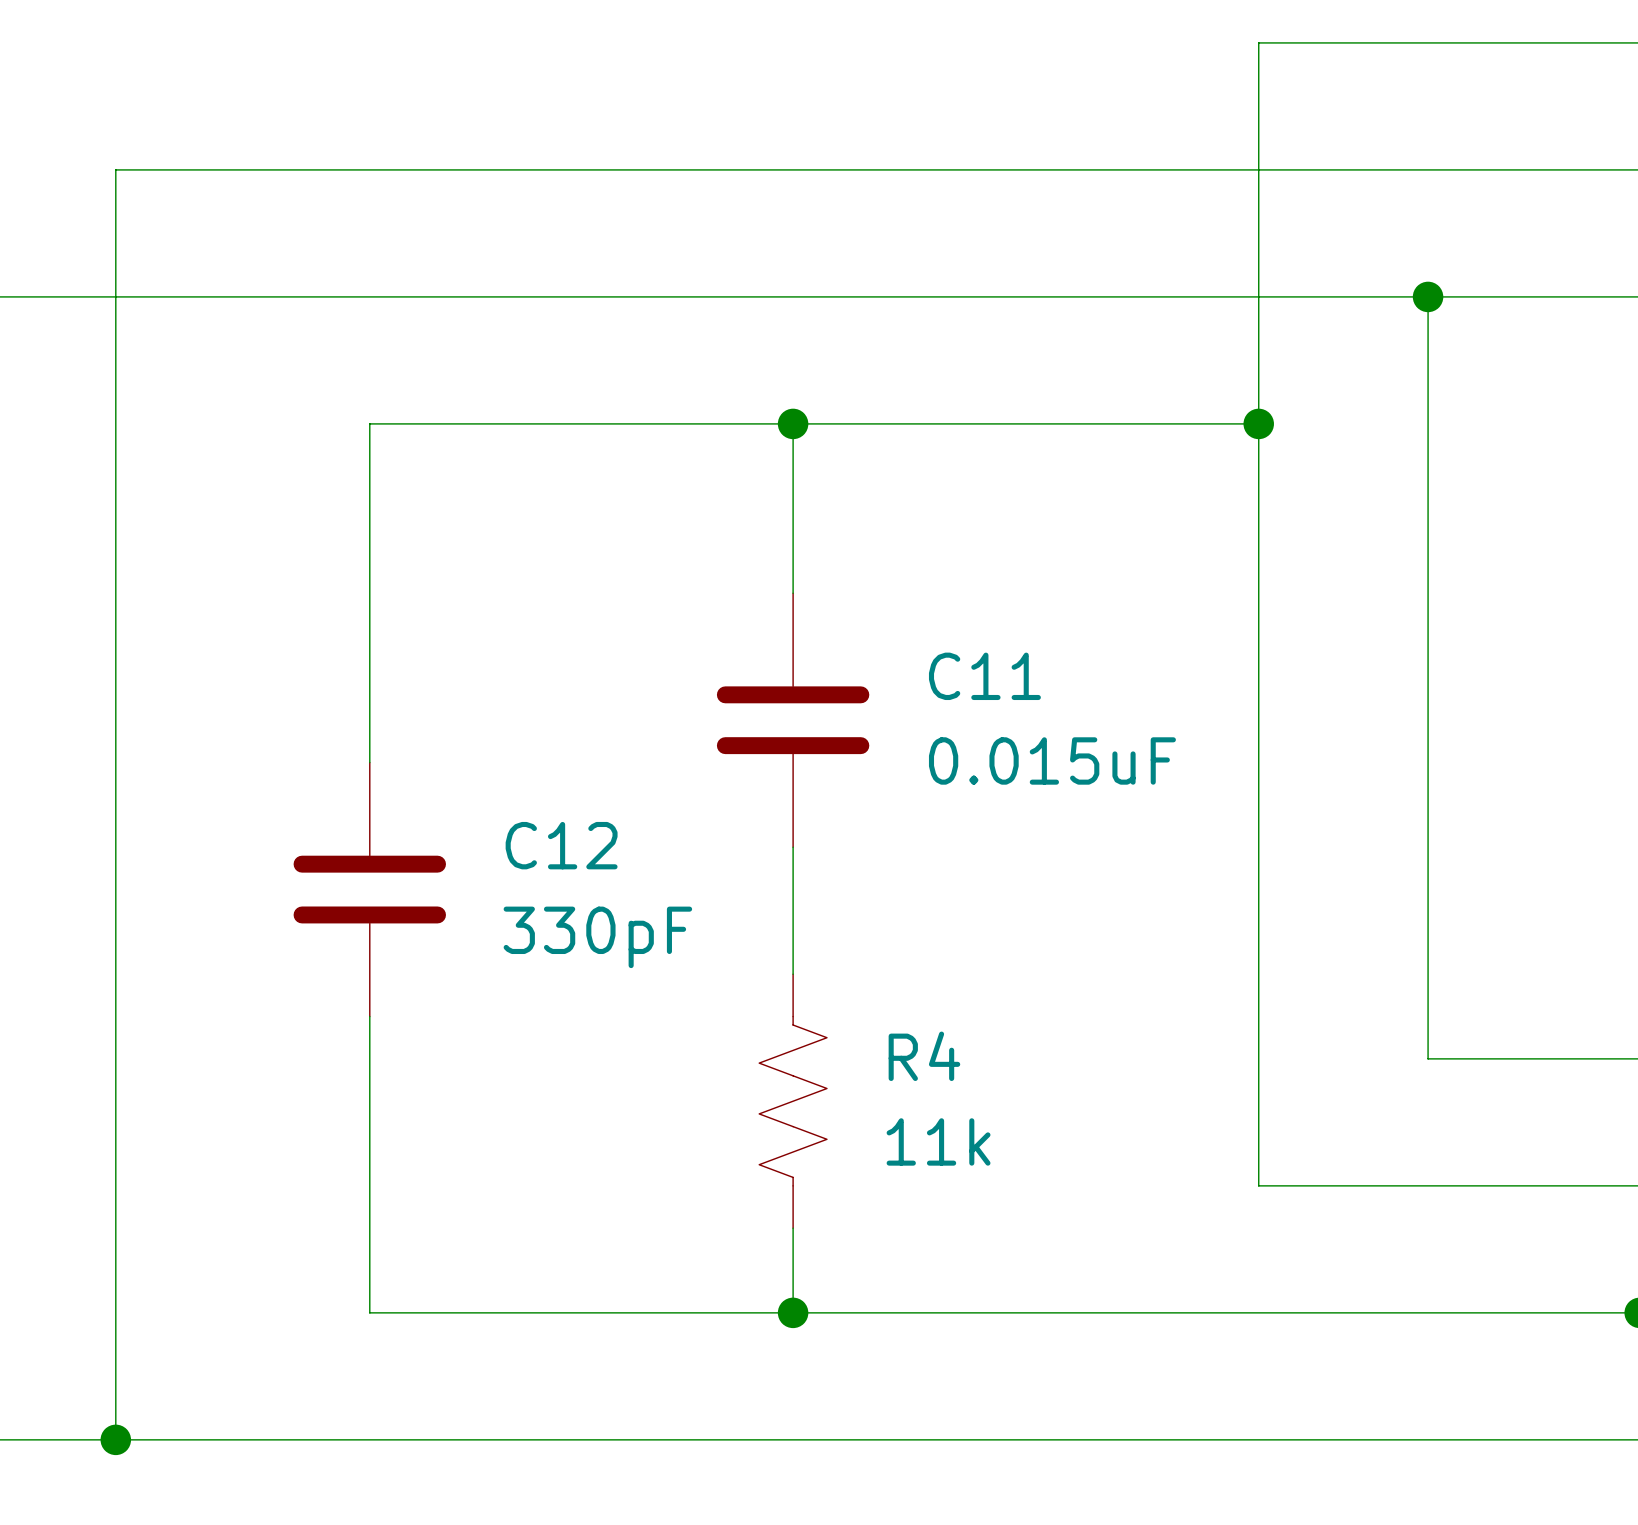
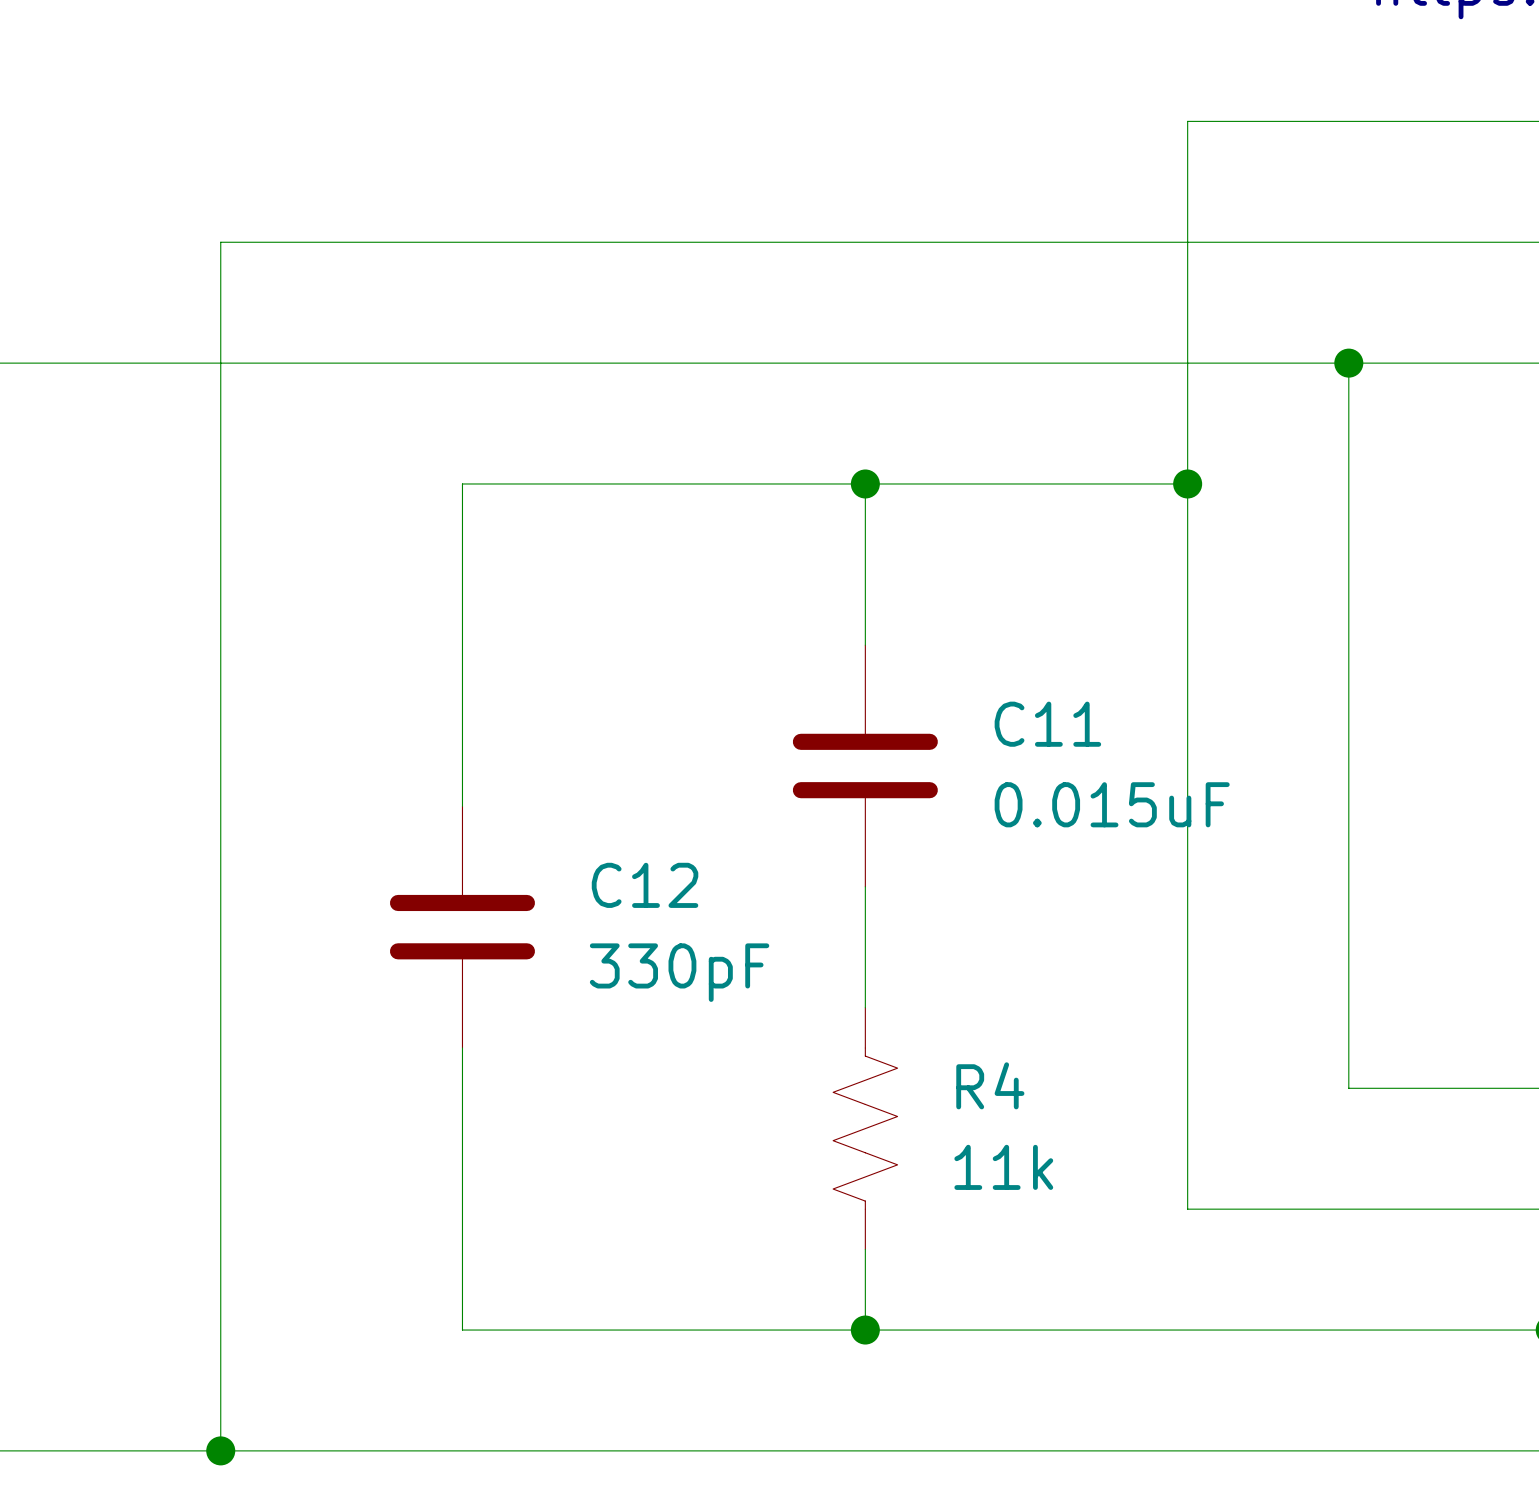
wire: (242, 169) (115, 169) (115, 1439) -> (220, 242) (220, 1450)
wire: (496, 423) (369, 423) (369, 762) -> (462, 483) (462, 806)
wire: (793, 423) (793, 593) -> (865, 483) (865, 645)
junction position: (793, 423) -> (865, 483)
C11 position: (793, 720) -> (865, 766)
wire: (793, 847) (793, 974) -> (865, 886) (865, 1007)
C12 position: (369, 889) -> (462, 927)
wire: (369, 1016) (369, 1312) (496, 1312) -> (462, 1048) (462, 1330)
R4 position: (793, 1101) -> (865, 1128)
wire: (793, 1228) (793, 1312) -> (865, 1249) (865, 1330)
junction position: (793, 1312) -> (865, 1330)
junction position: (115, 1439) -> (220, 1450)

